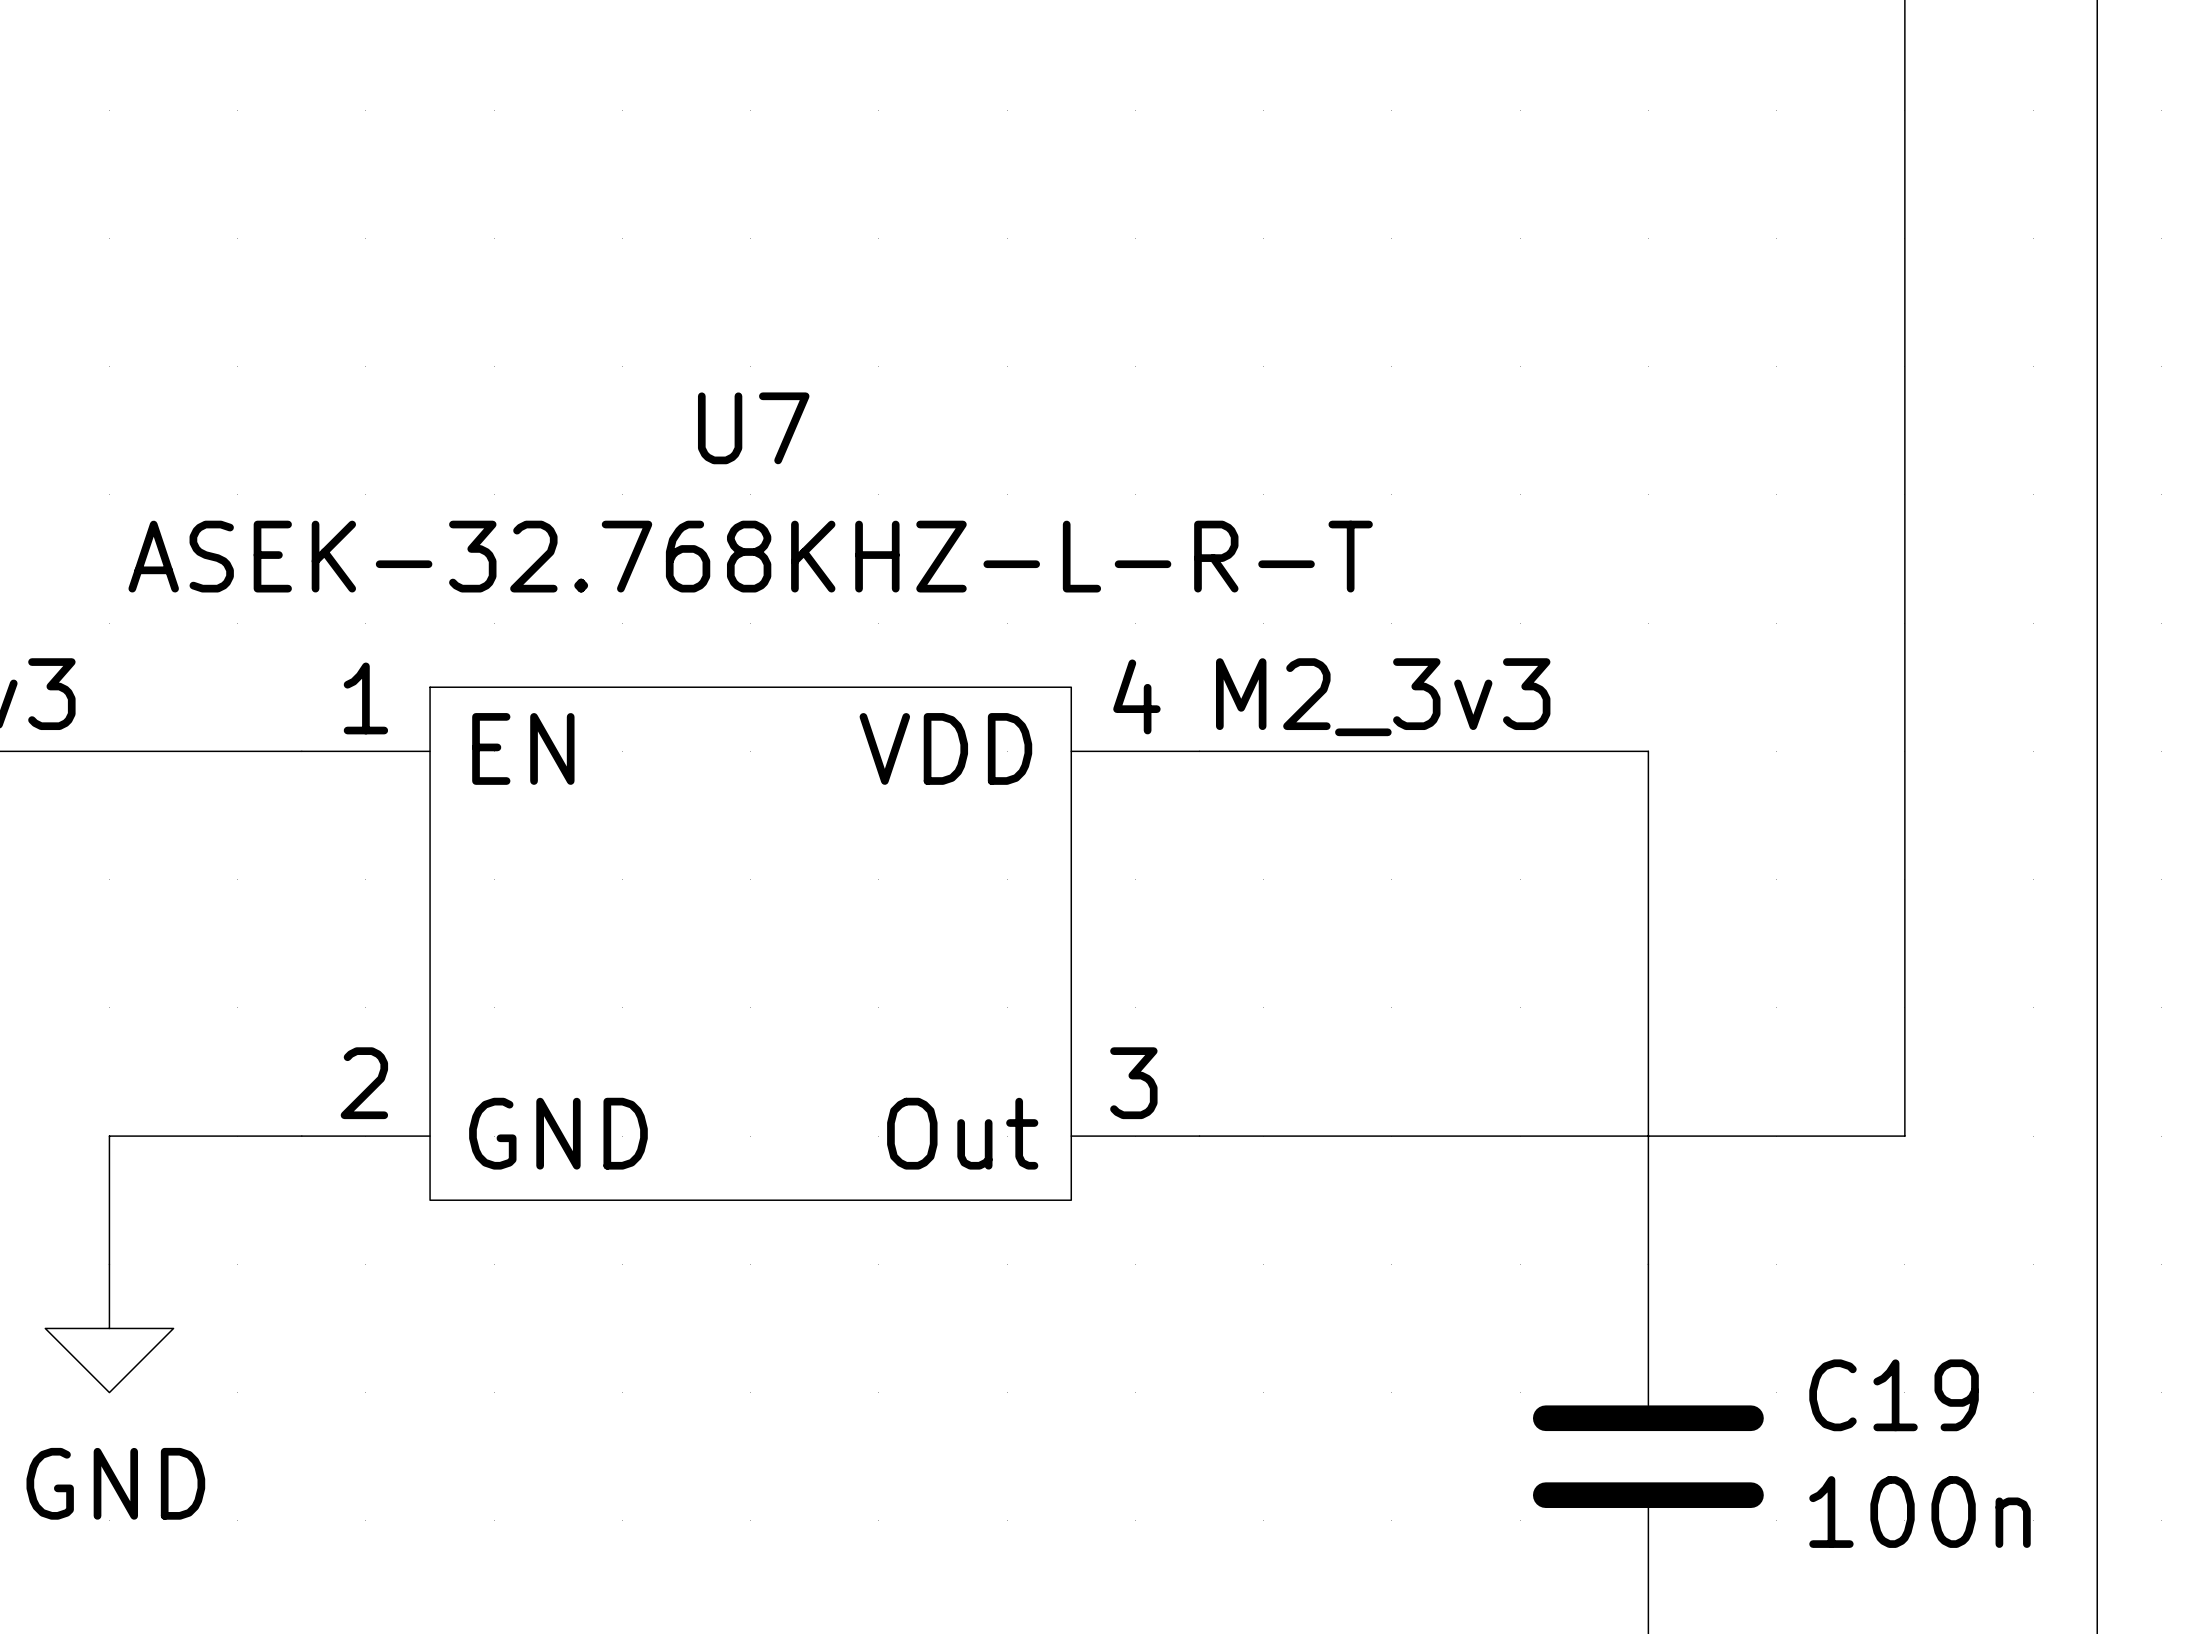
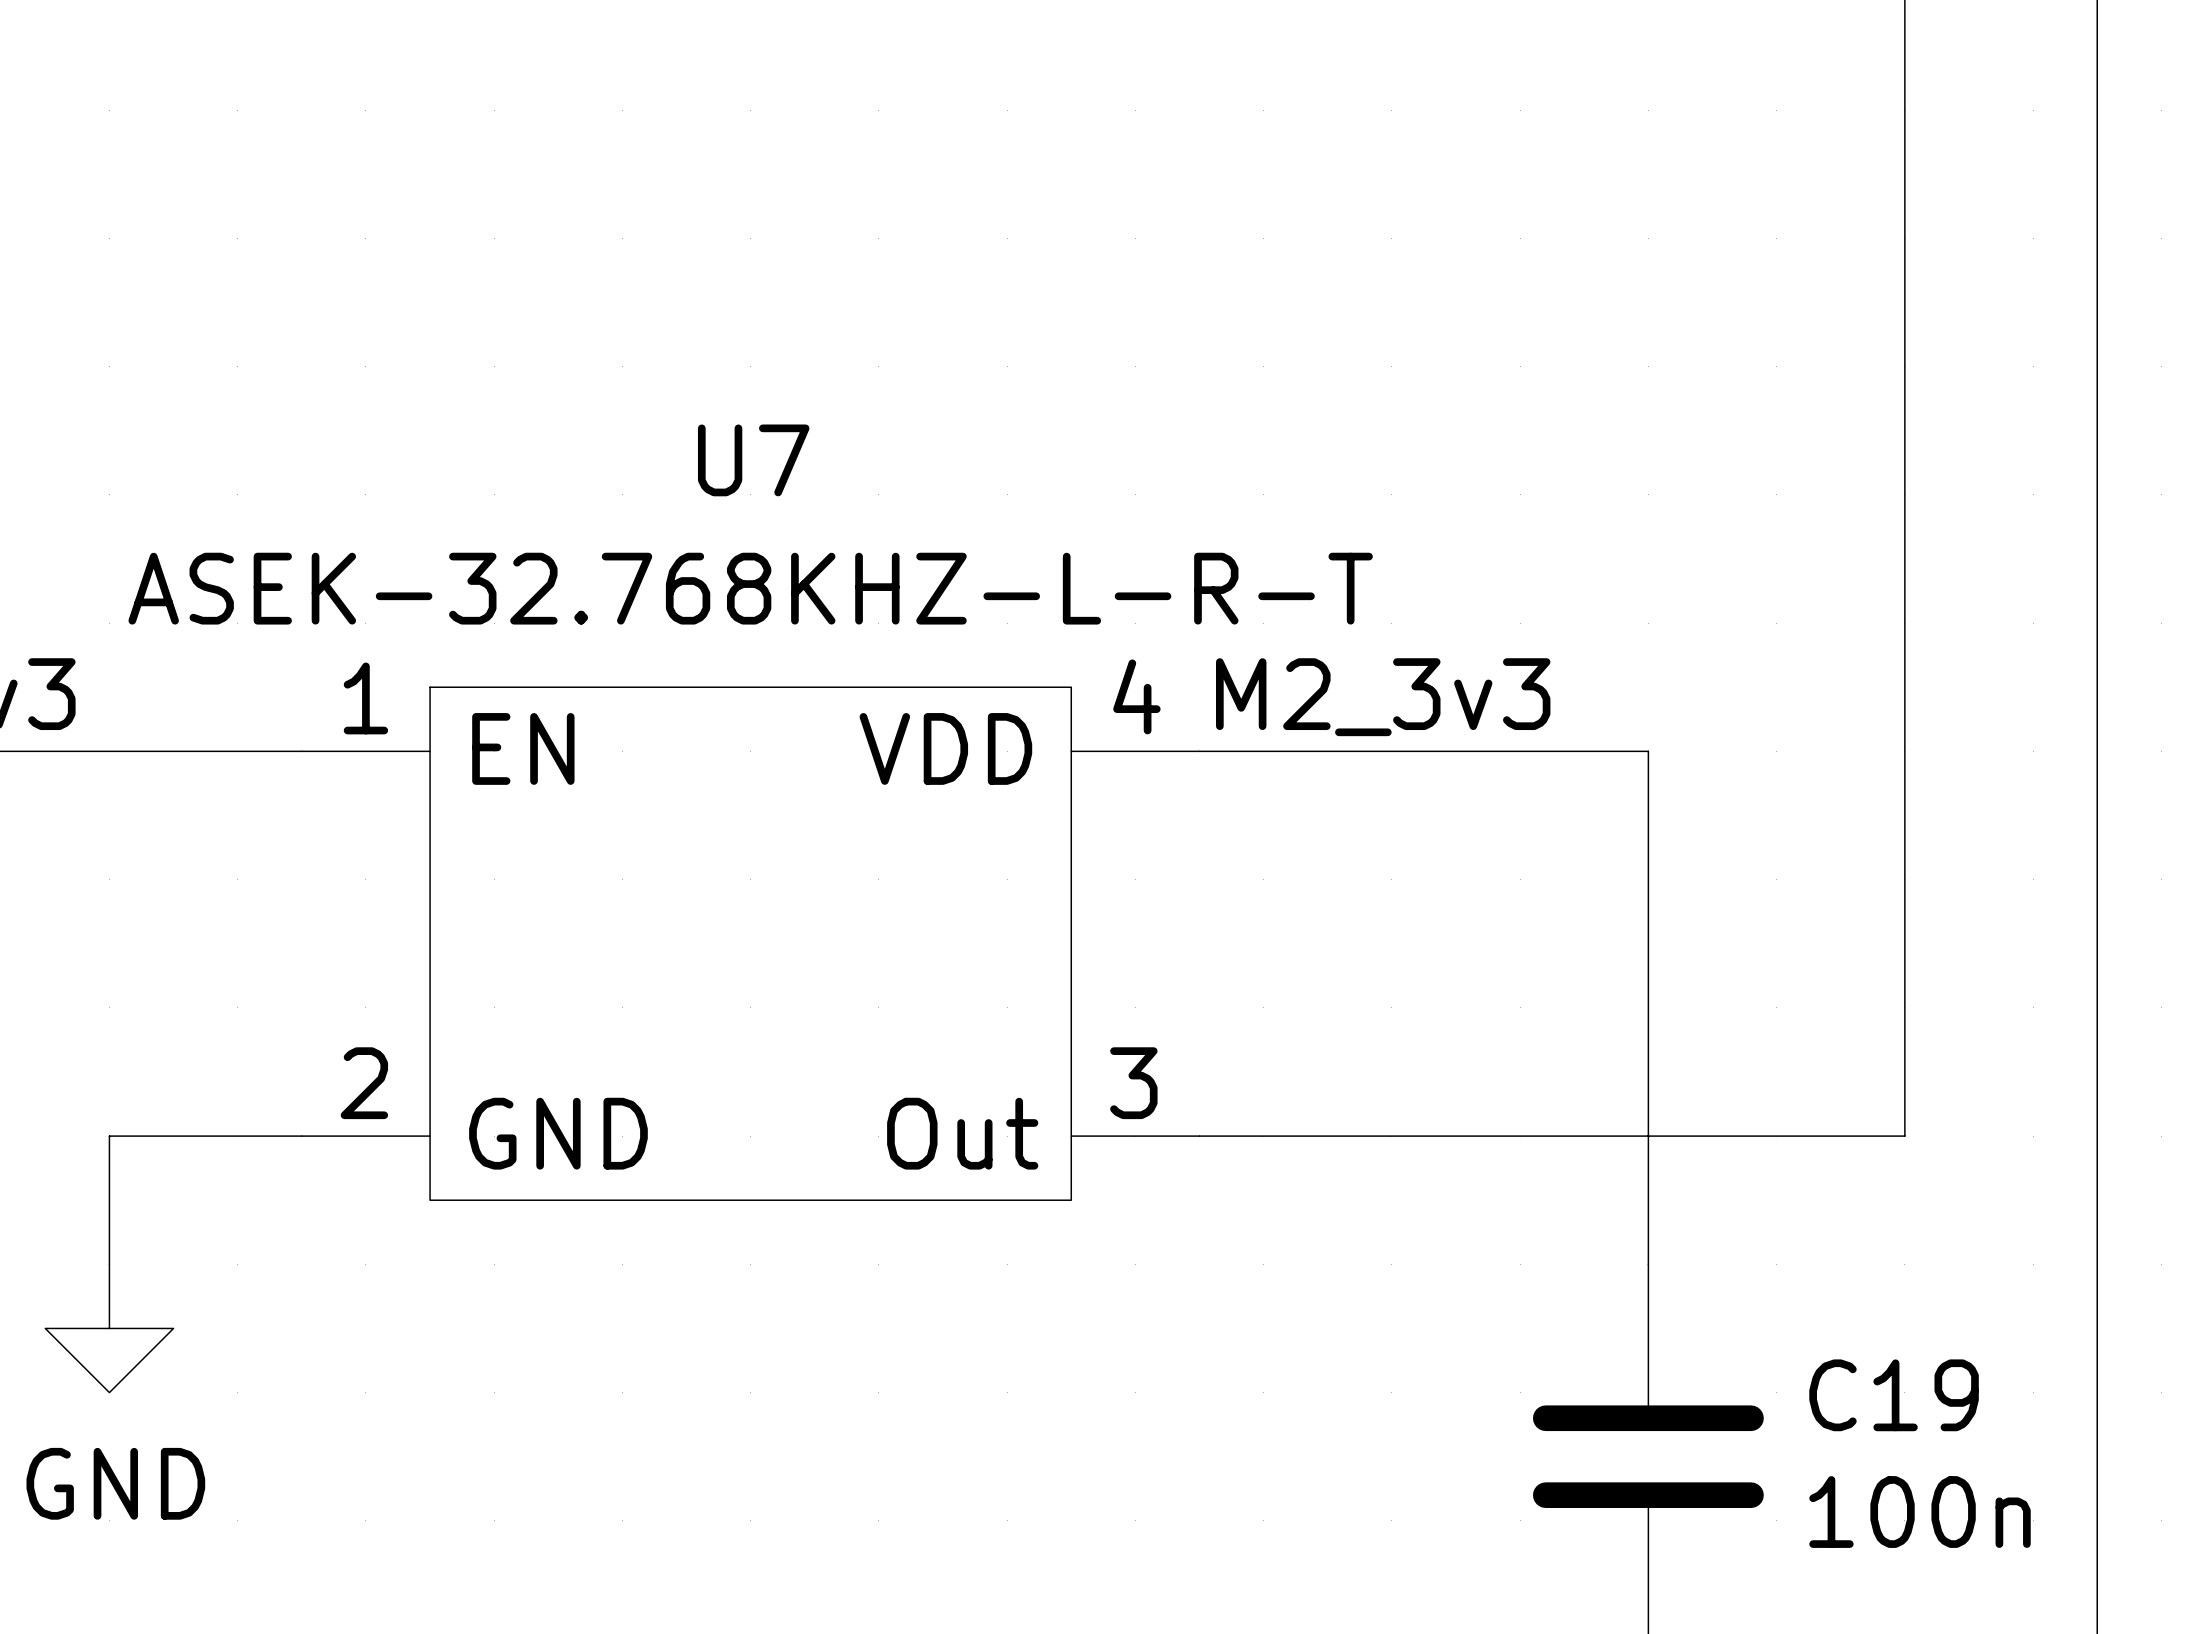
U7 name position: U7 (753, 428) -> U7 (753, 460)
U7 value position: ASEK-32.768KHZ-L-R-T (750, 556) -> ASEK-32.768KHZ-L-R-T (750, 588)

